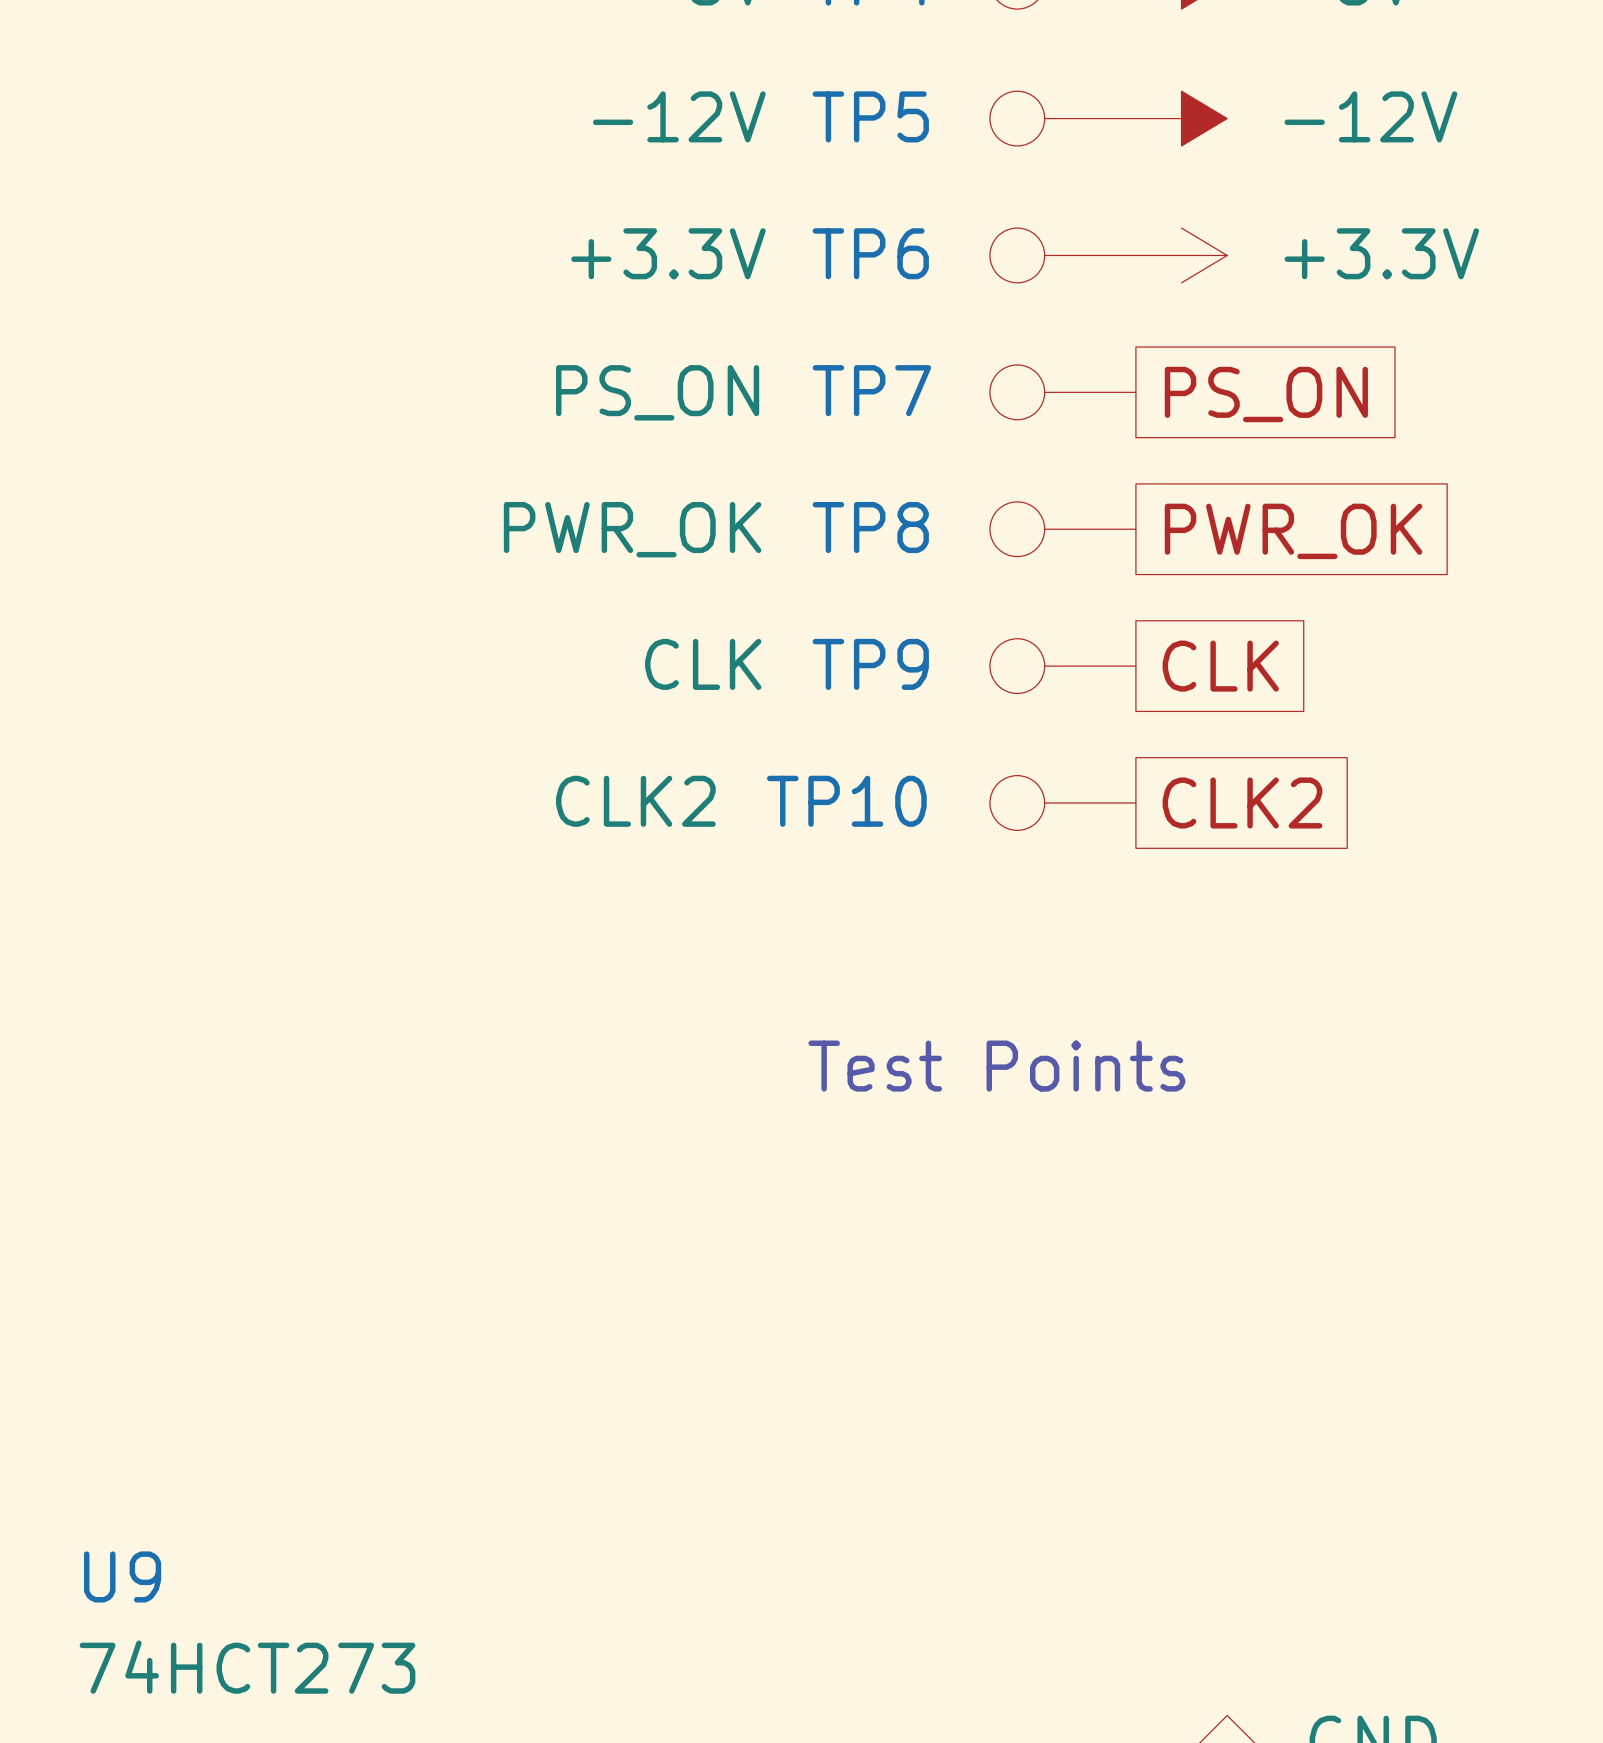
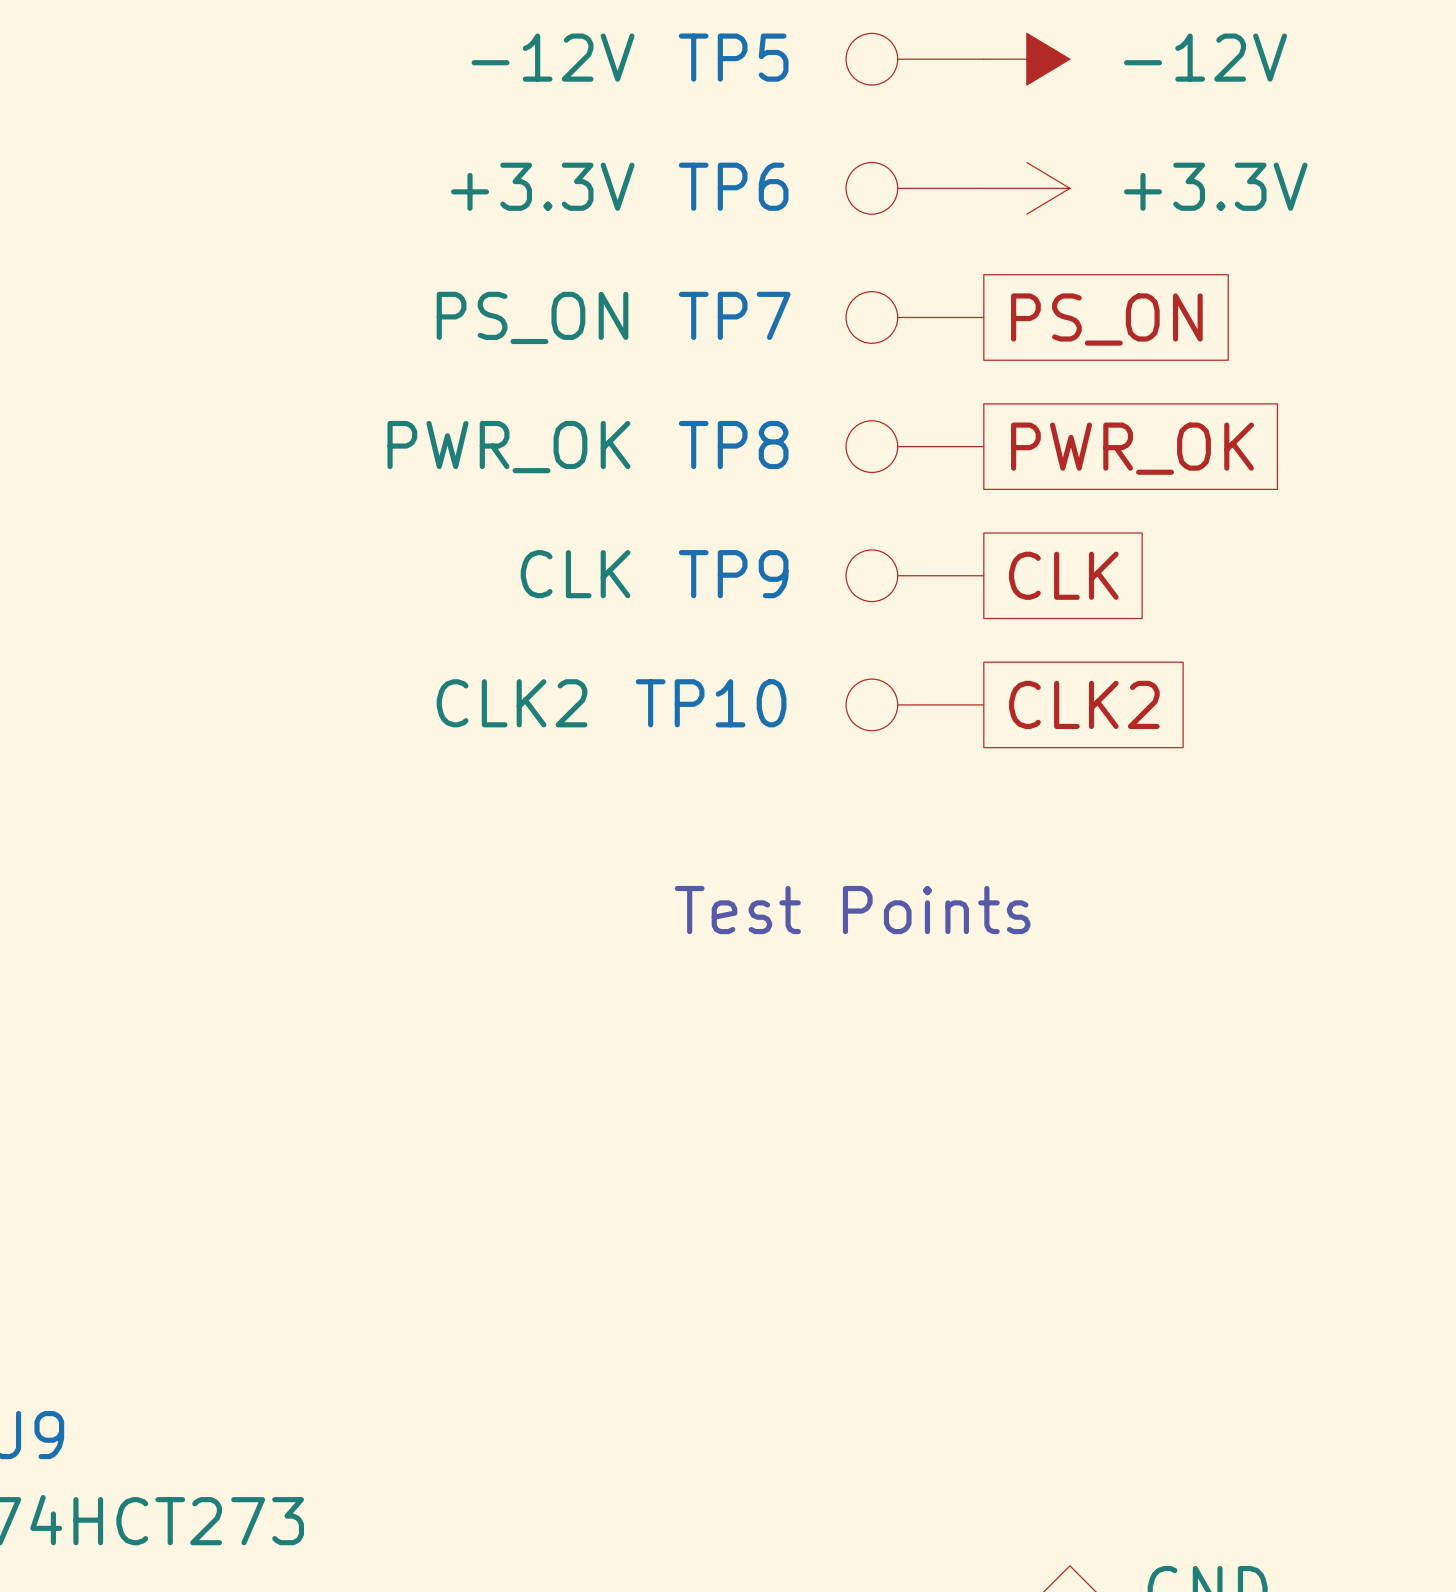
text position: Test Points (996, 1066) -> Test Points (852, 910)

